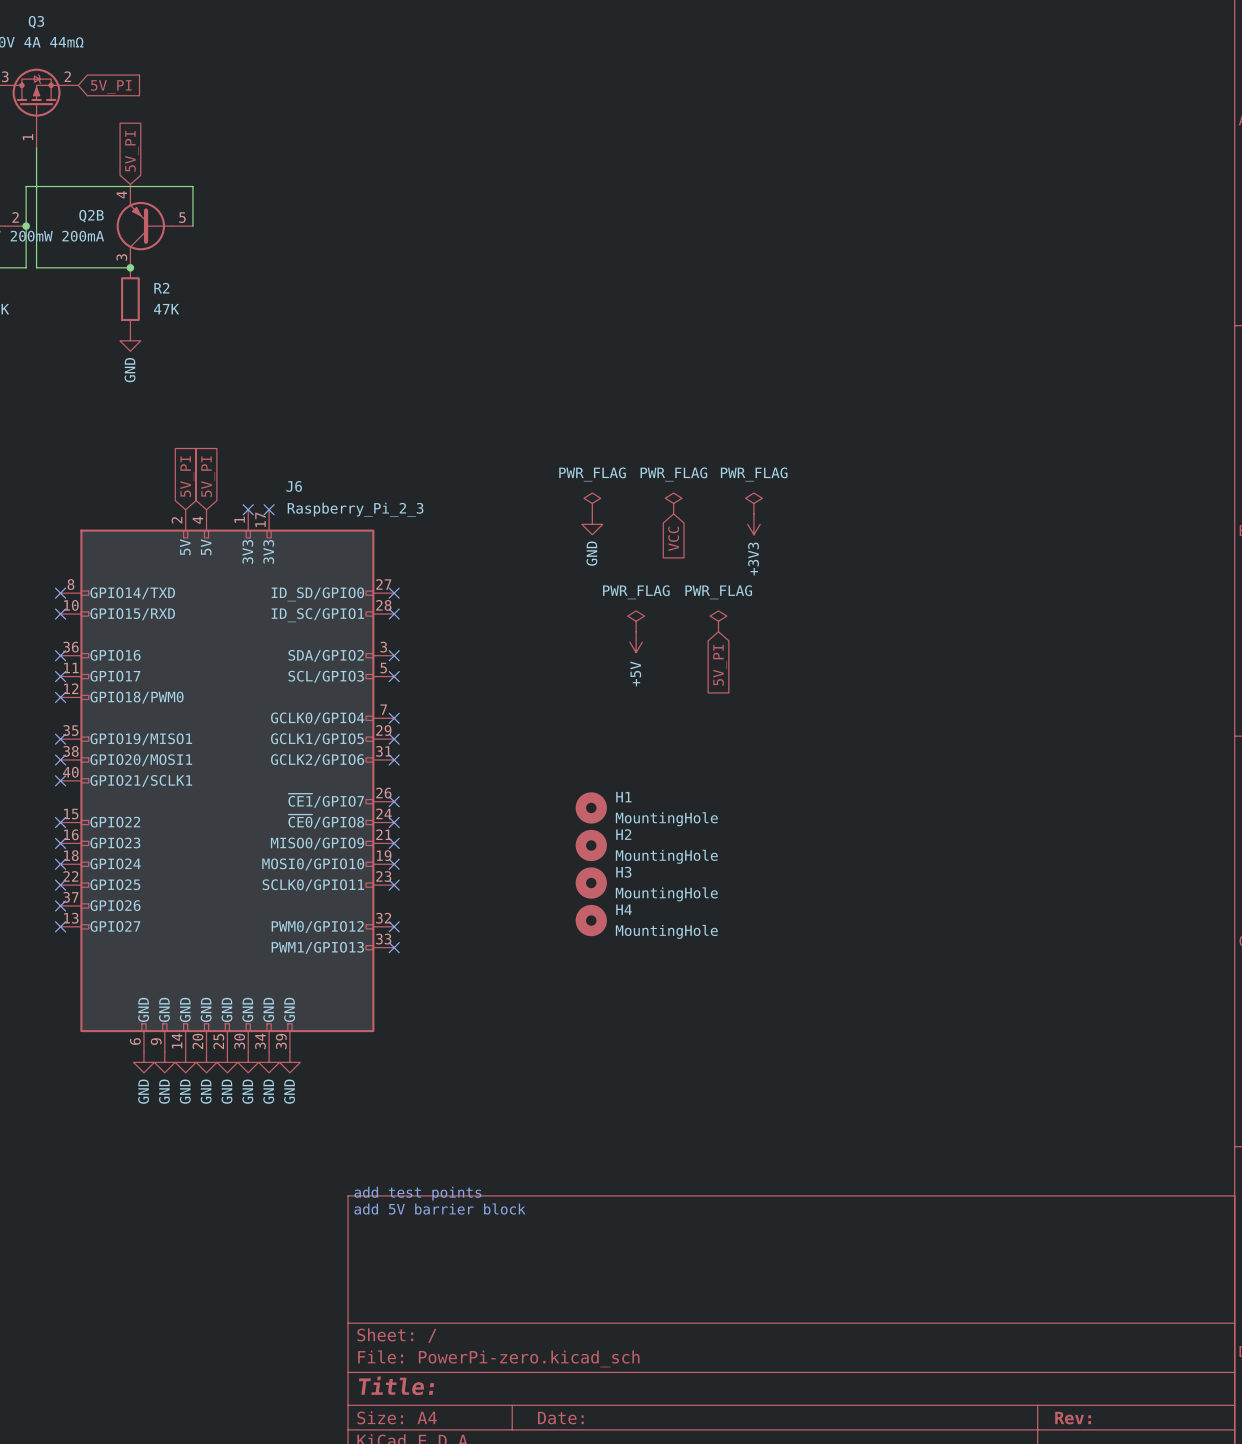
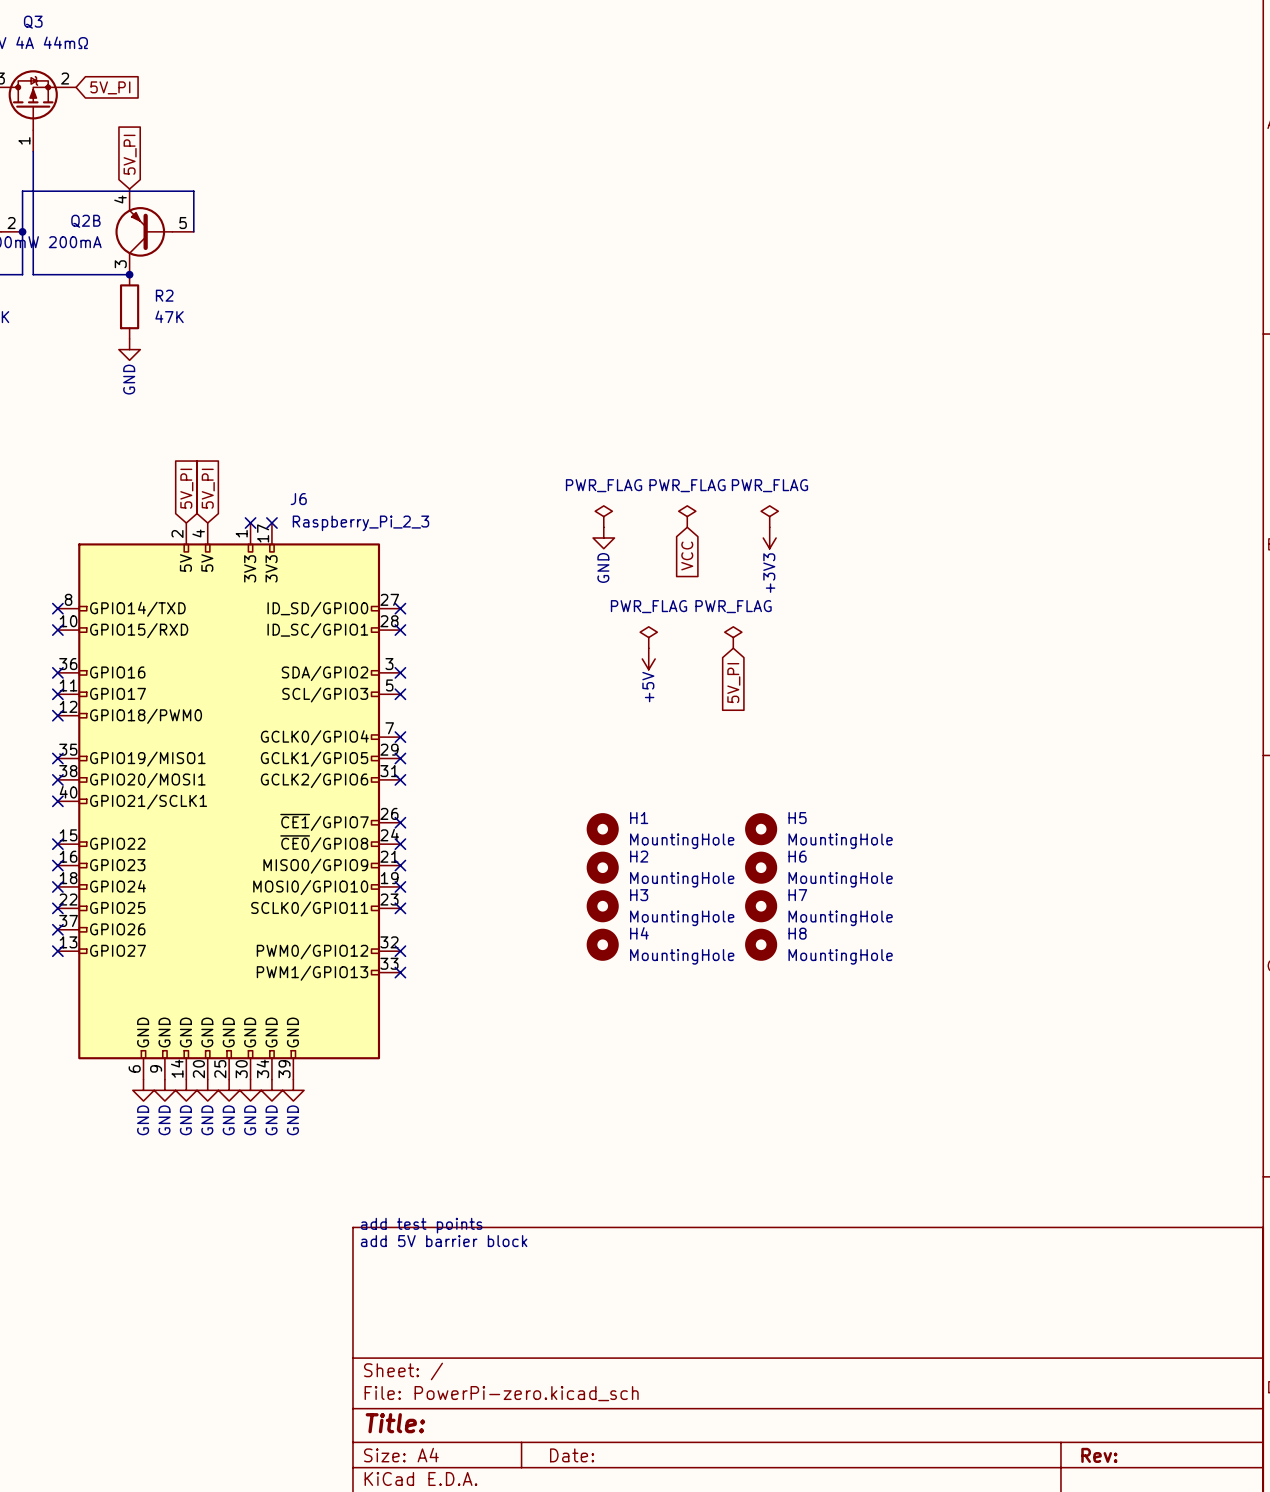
H5: none -> MountingHole (761, 829)
H6: none -> MountingHole (761, 867)
H7: none -> MountingHole (761, 906)
H8: none -> MountingHole (761, 944)

